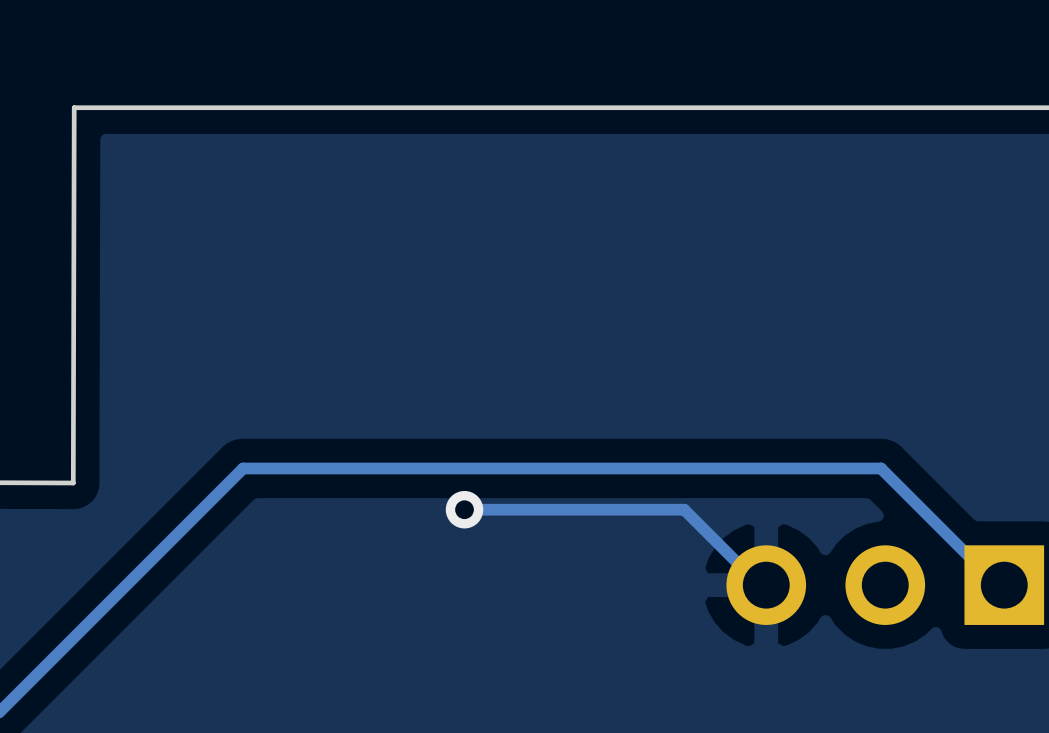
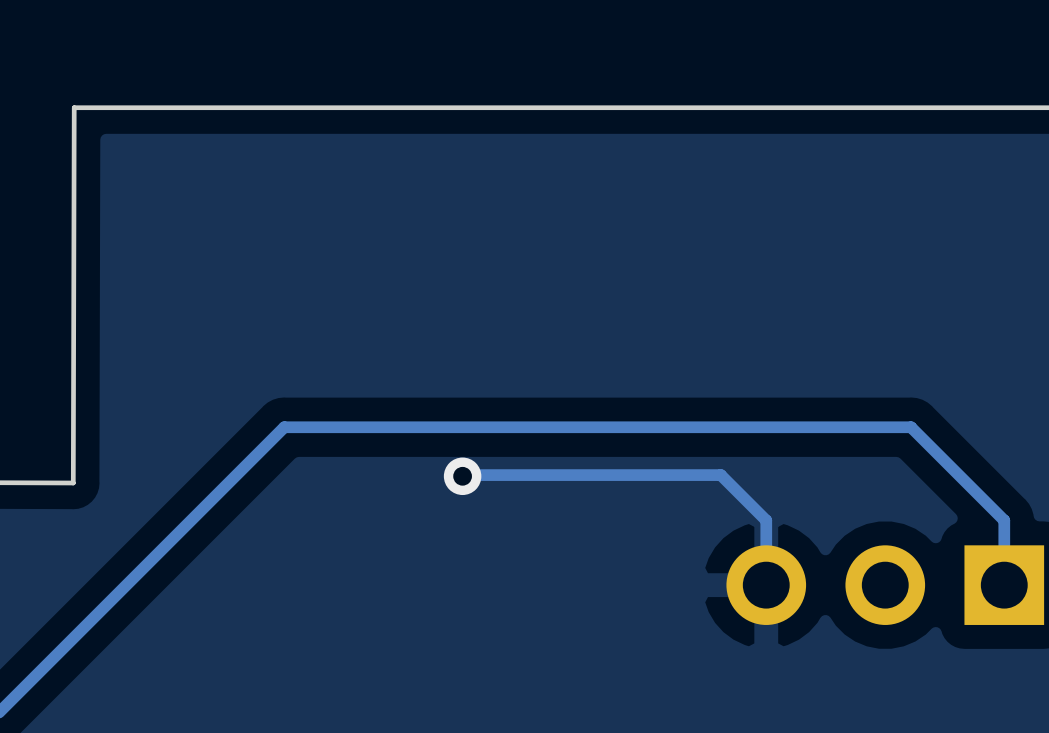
track: (243, 468) (881, 468) (1014, 602) -> (243, 468) (284, 427) (911, 427) (1004, 520) (1004, 585)
track: none -> (462, 476) (461, 475) (720, 475) (766, 520) (766, 591)
track: (464, 509) (684, 509) (776, 602) -> none
via position: (464, 509) -> (462, 476)

